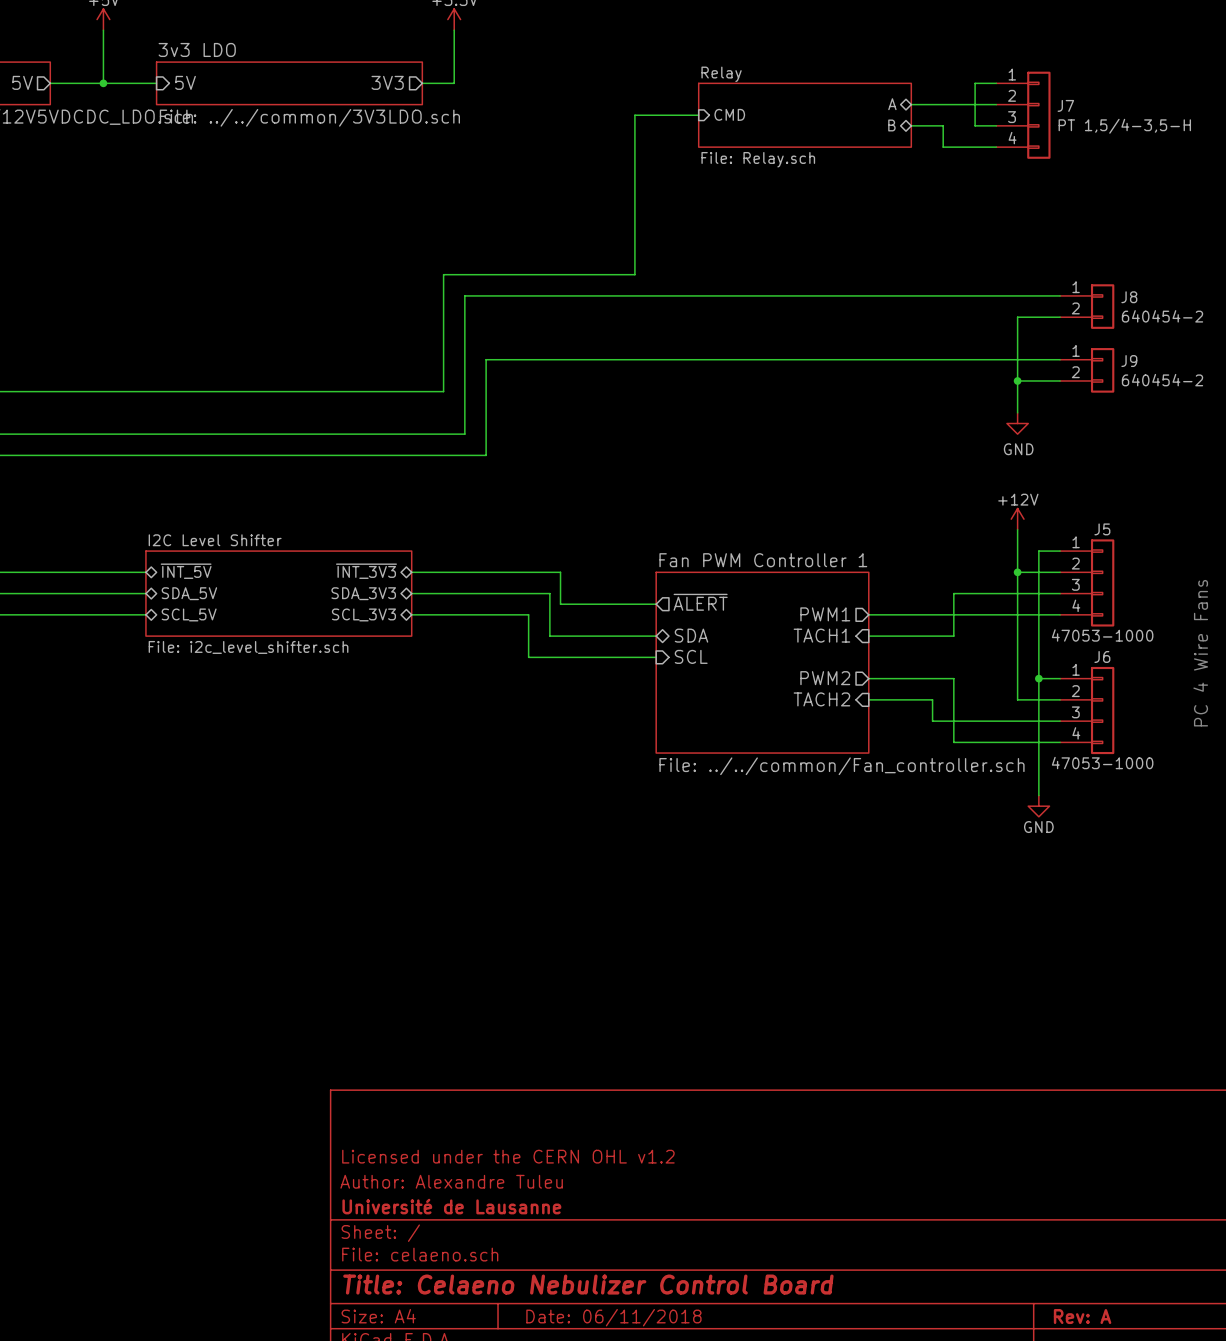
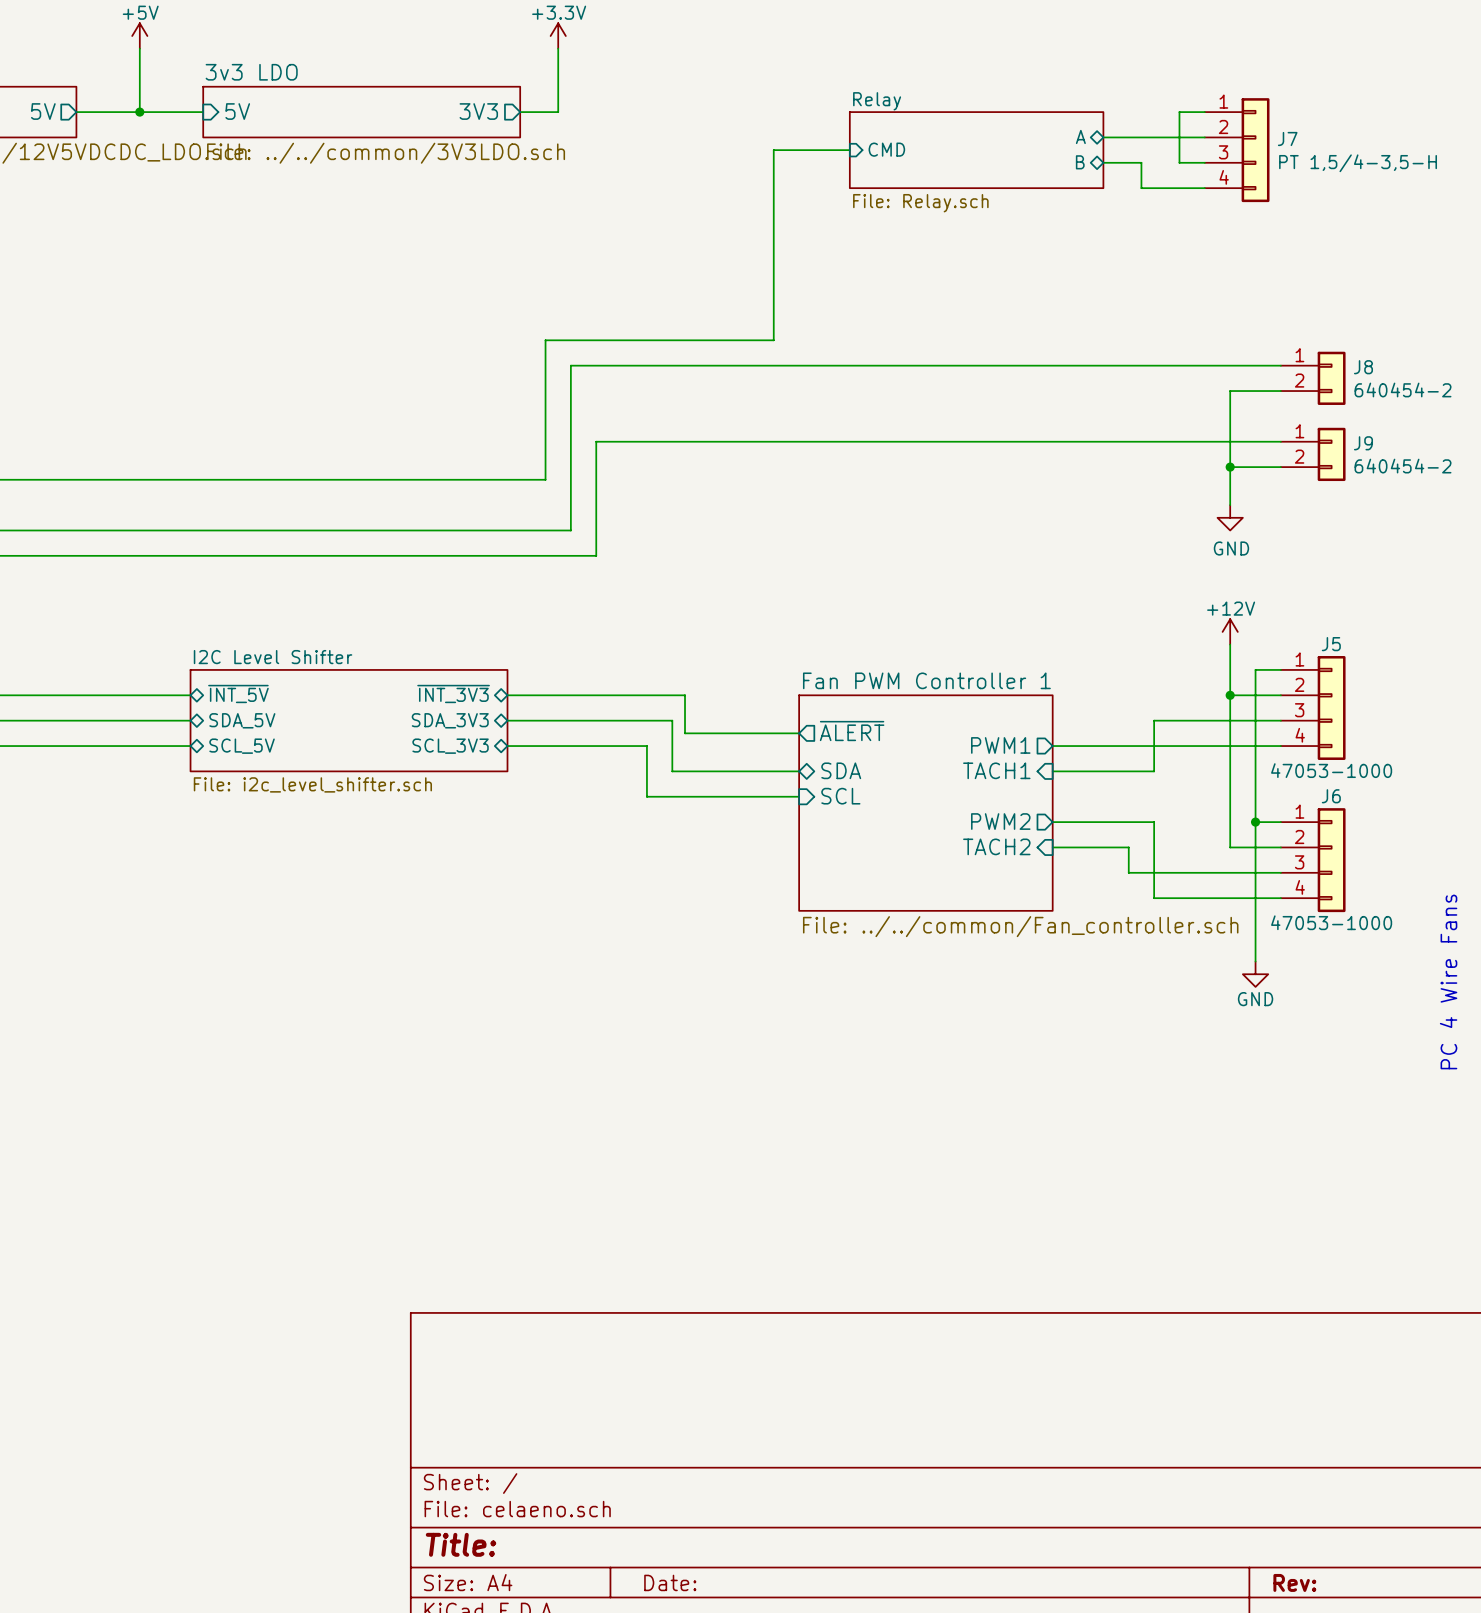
text position: PC 4 Wire Fans (1200, 653) -> PC 4 Wire Fans (1448, 981)
title block: Licensed under the CERN OHL v1.2 (508, 1156) -> none
title block: Author: Alexandre Tuleu (451, 1181) -> none
title block: Université de Lausanne (451, 1206) -> none
title block: Title: Celaeno Nebulizer Control Board (588, 1284) -> Title: (461, 1544)
title block: Rev: A (1082, 1316) -> Rev: (1294, 1582)
title block: Date: 06/11/2018 (613, 1317) -> Date: (670, 1582)

